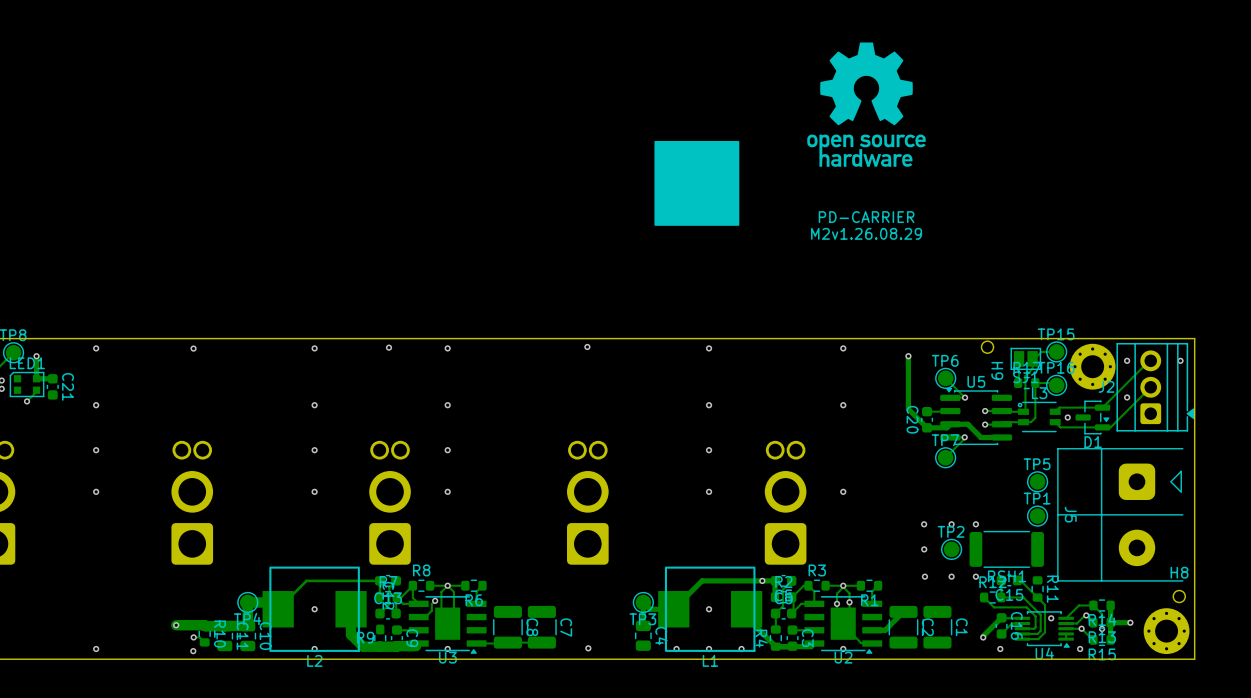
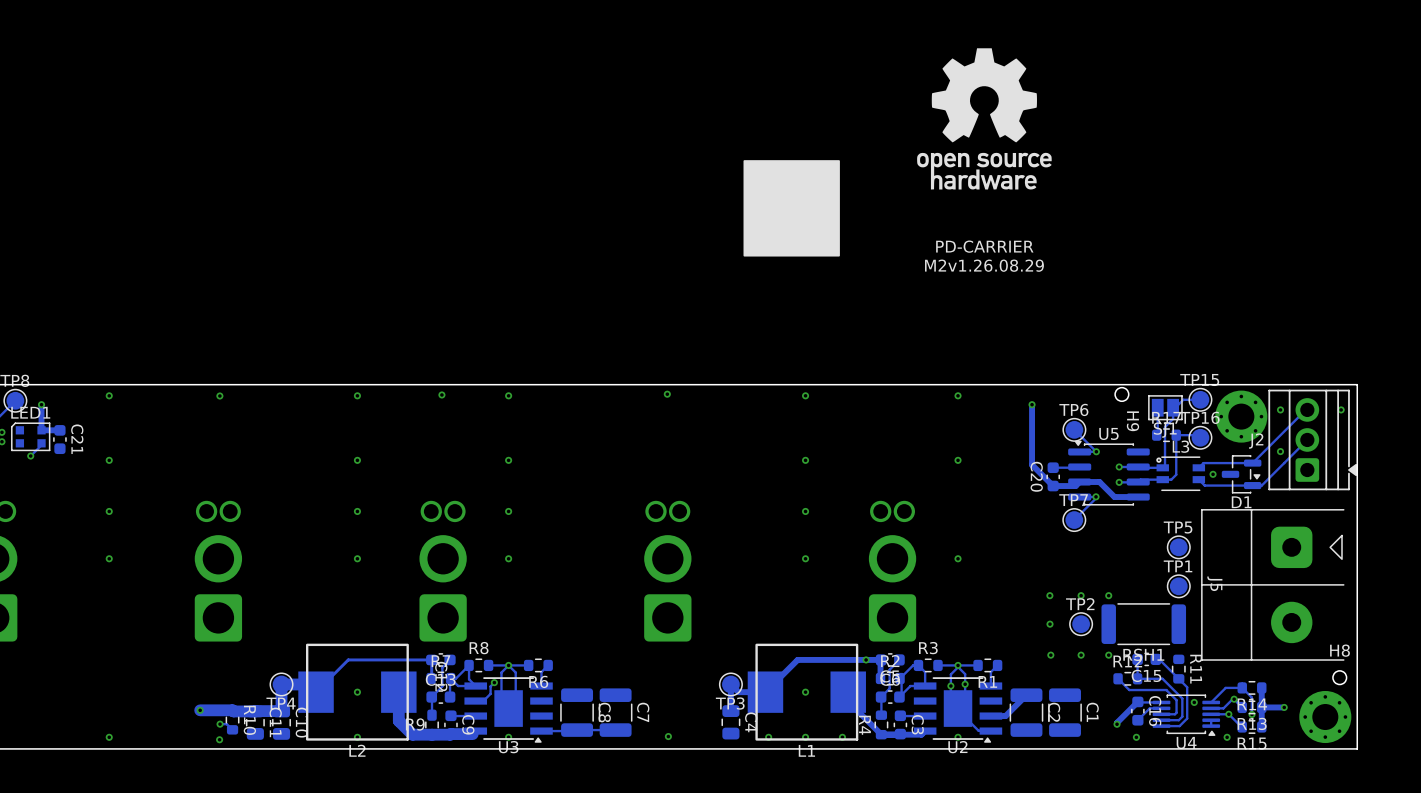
bottom track: none -> (431, 697) (432, 715)

